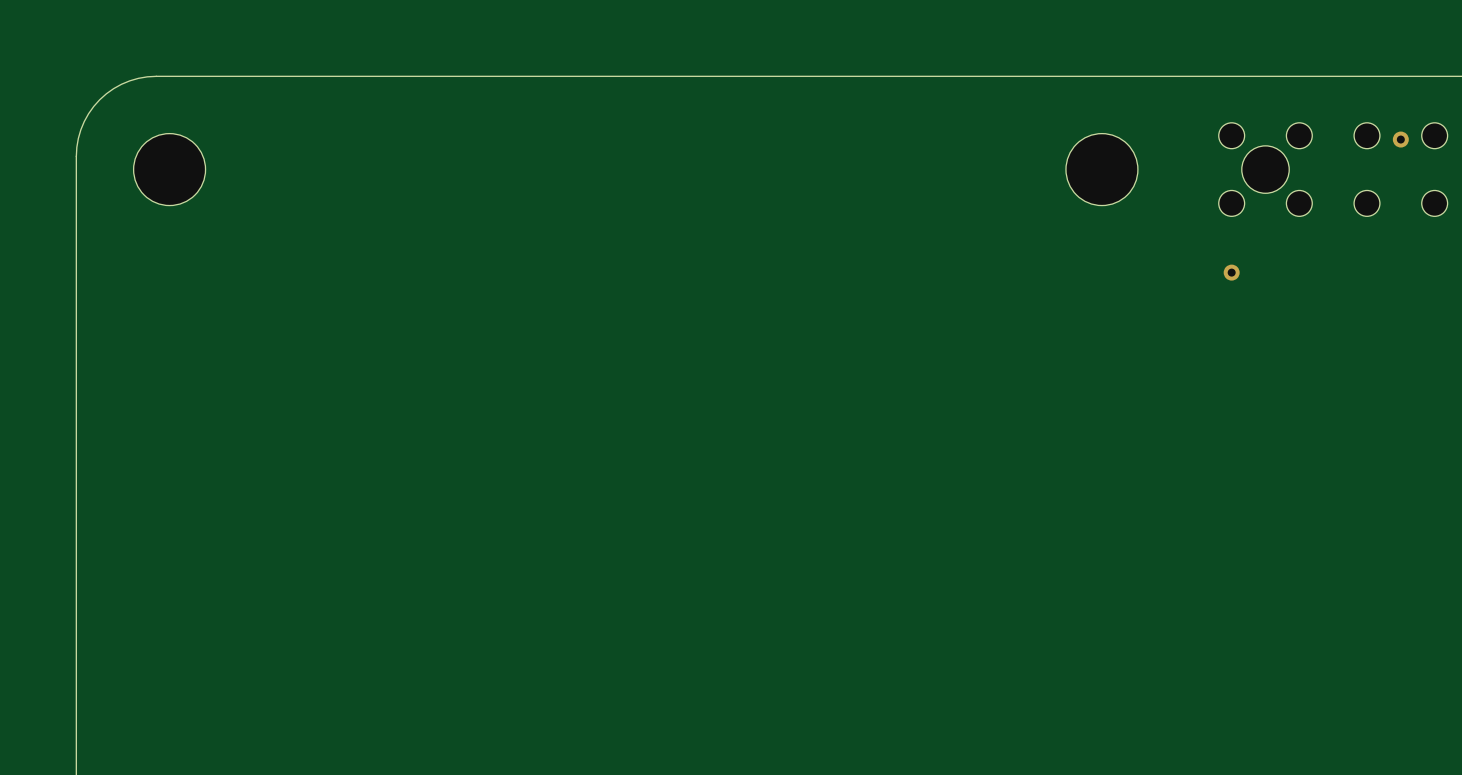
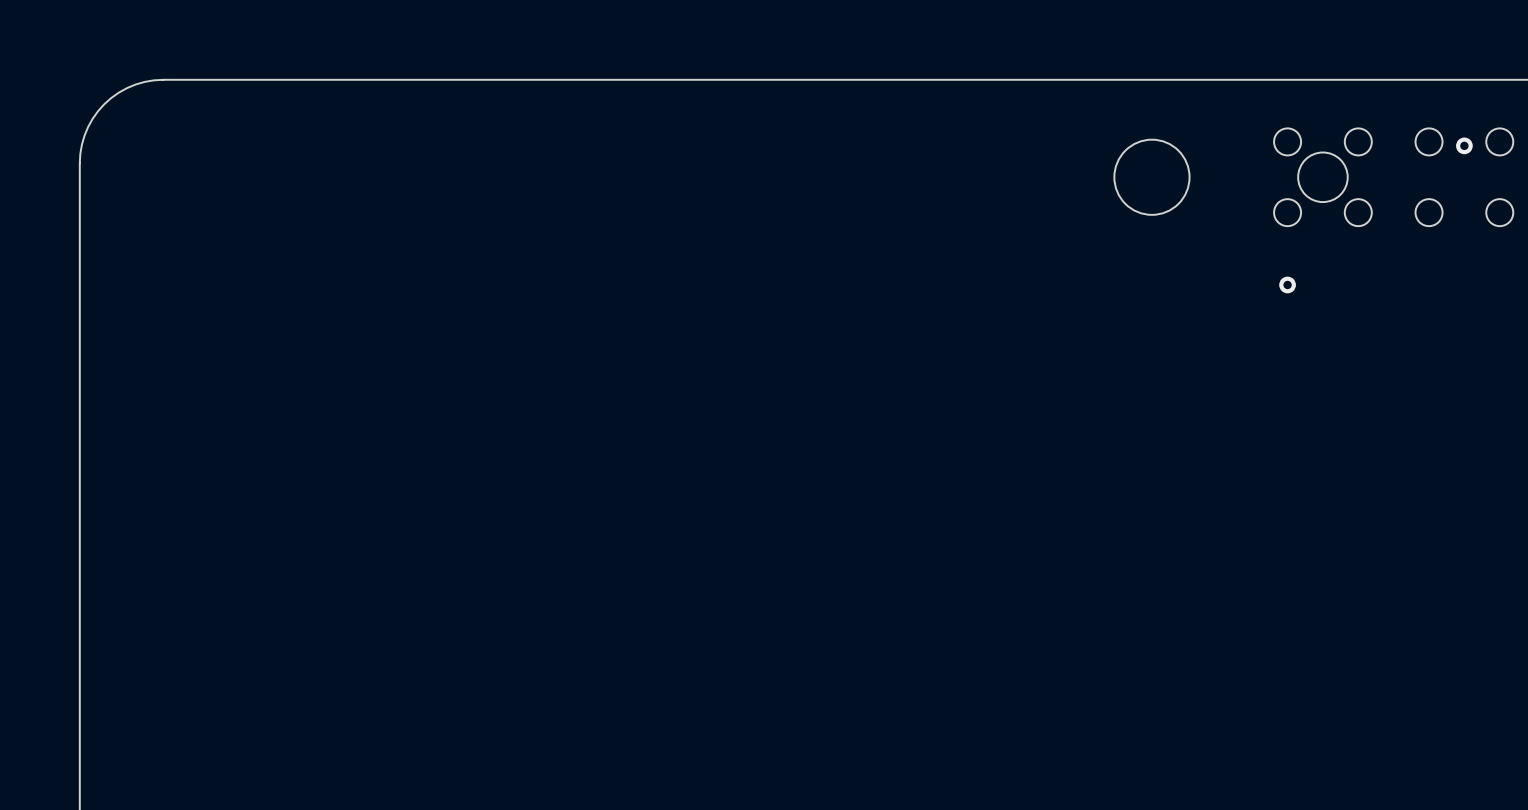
part: (169, 169) -> none

